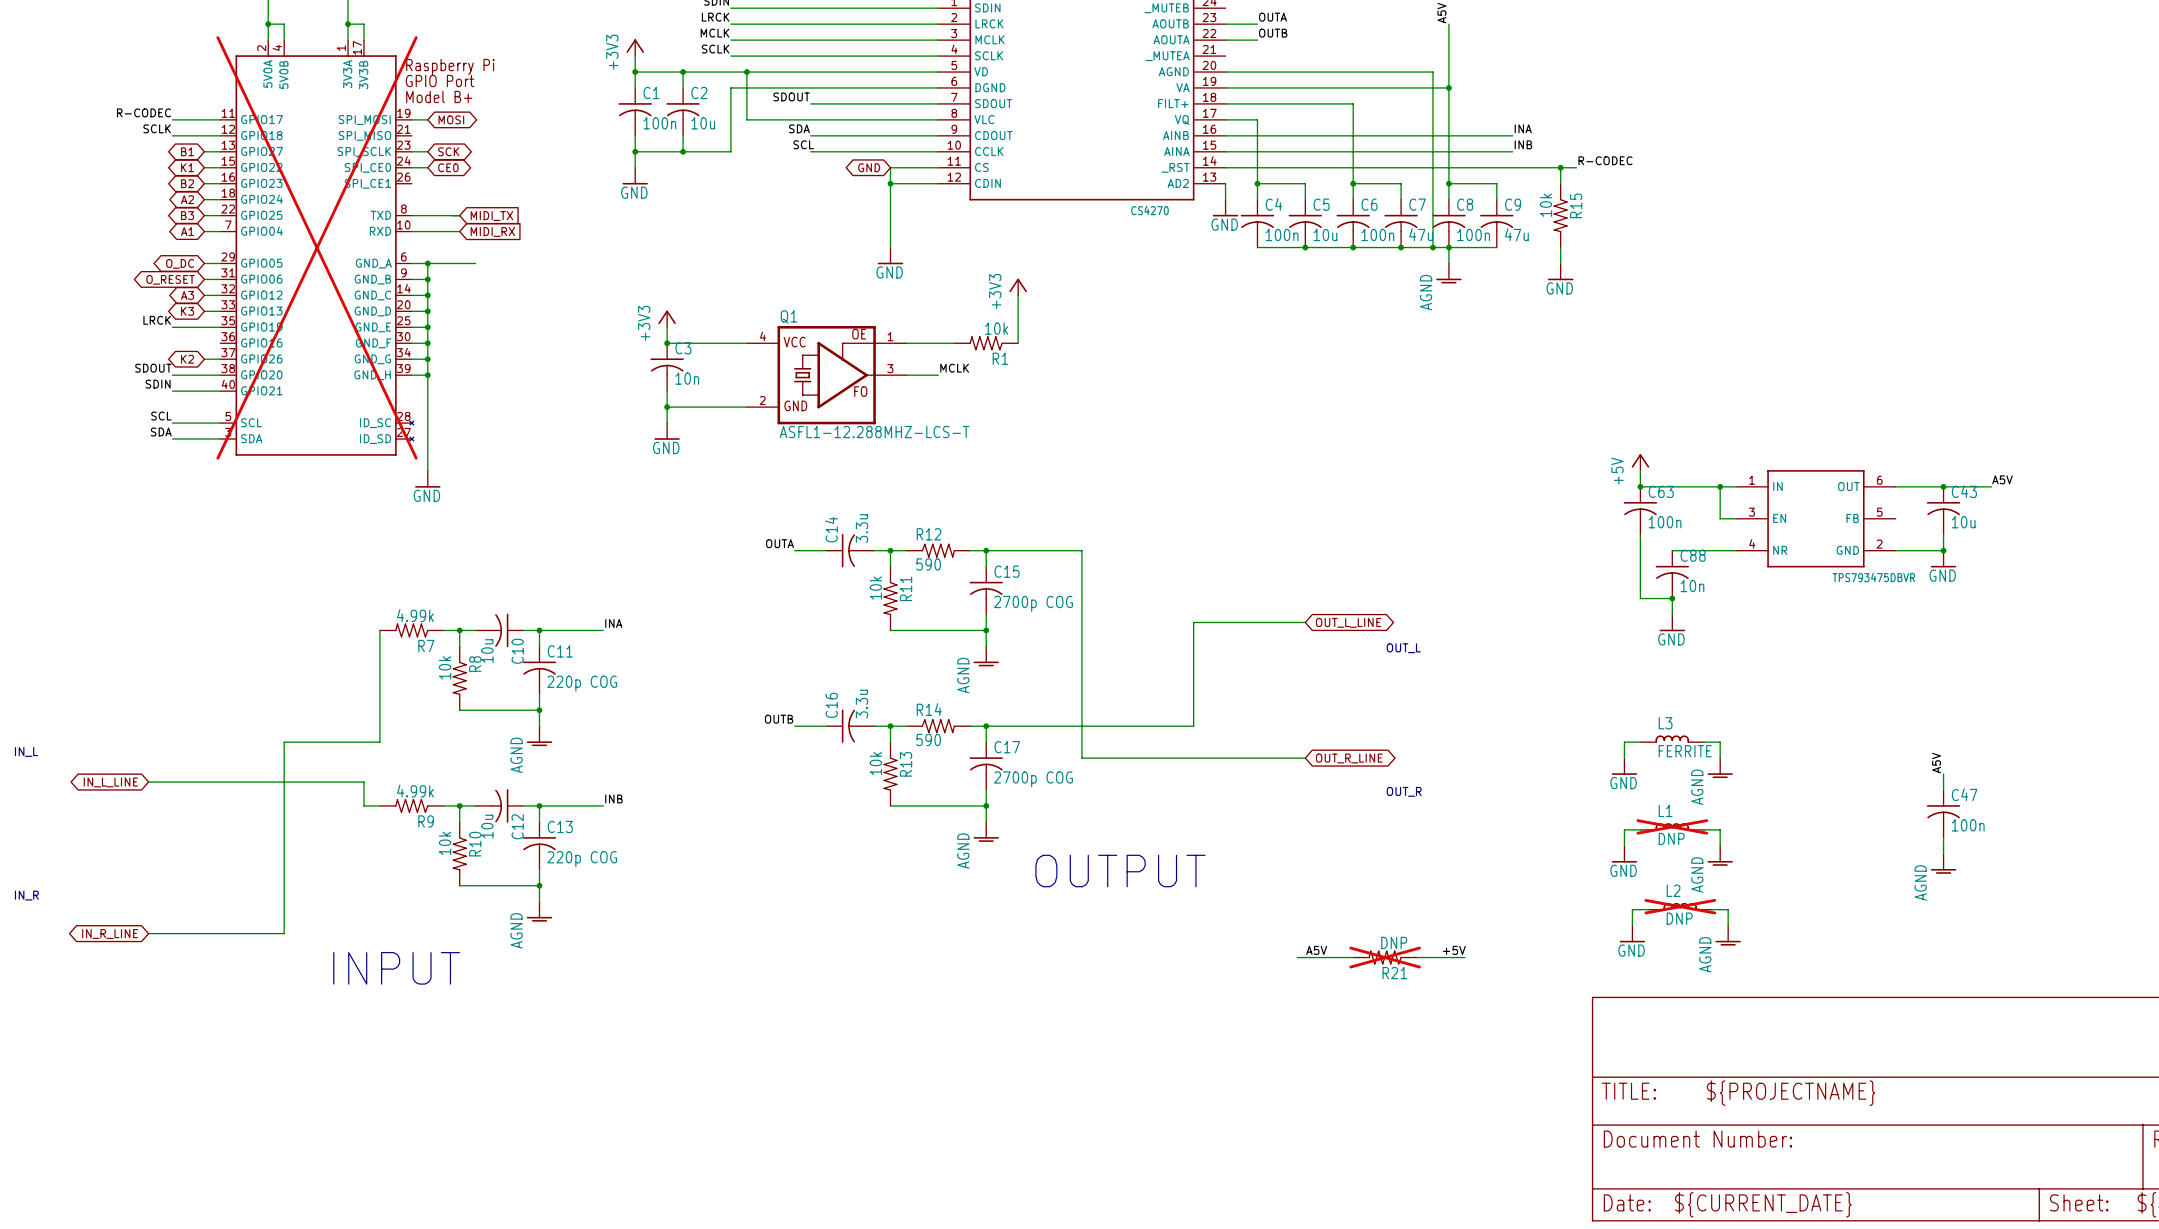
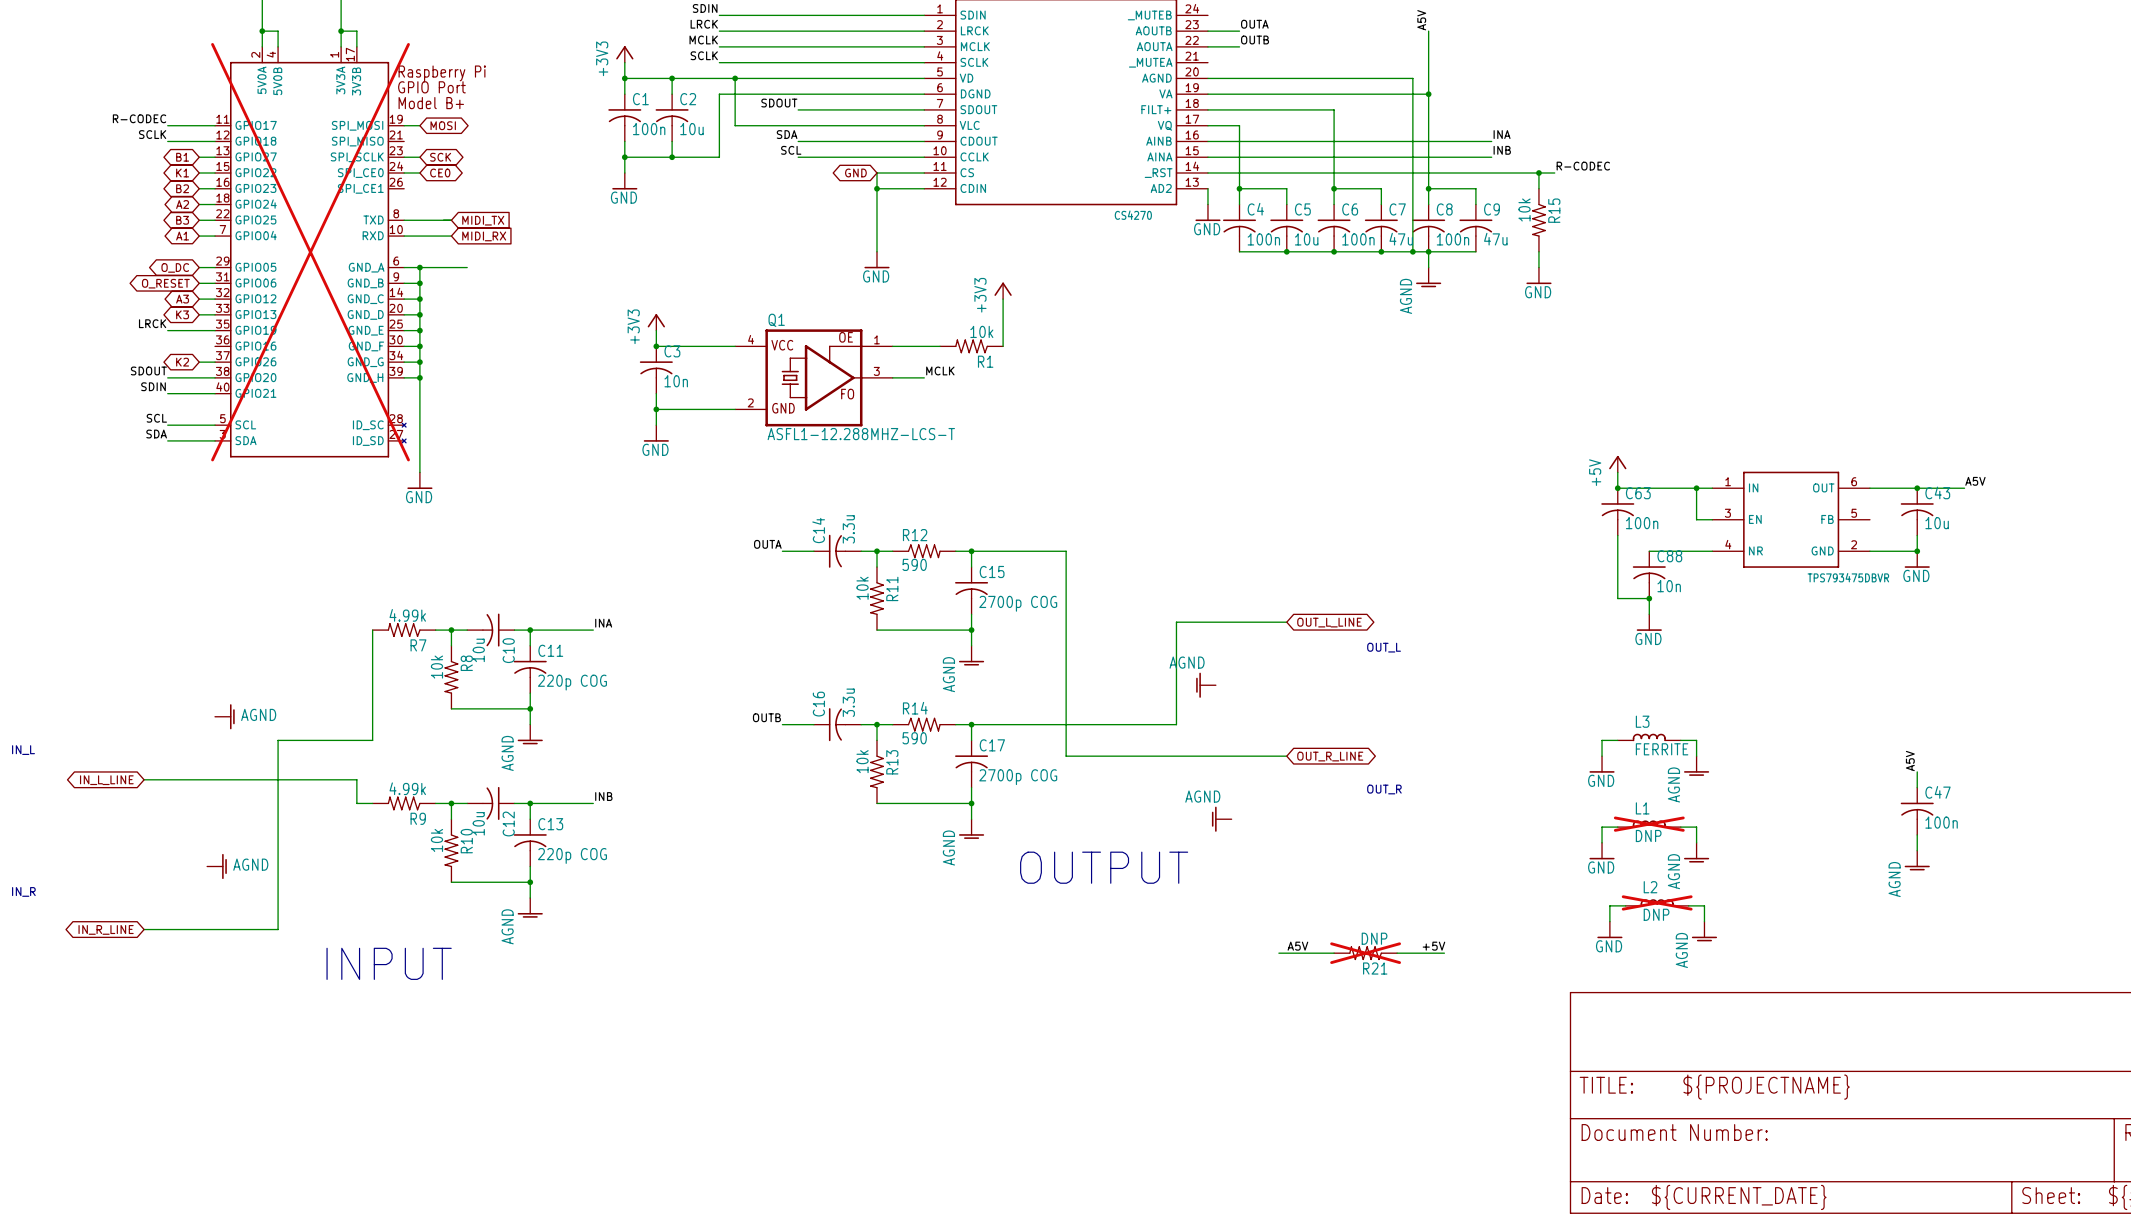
power symbol: none -> AGND (1206, 685)
power symbol: none -> AGND (224, 716)
power symbol: none -> AGND (1221, 819)
power symbol: none -> AGND (216, 866)

